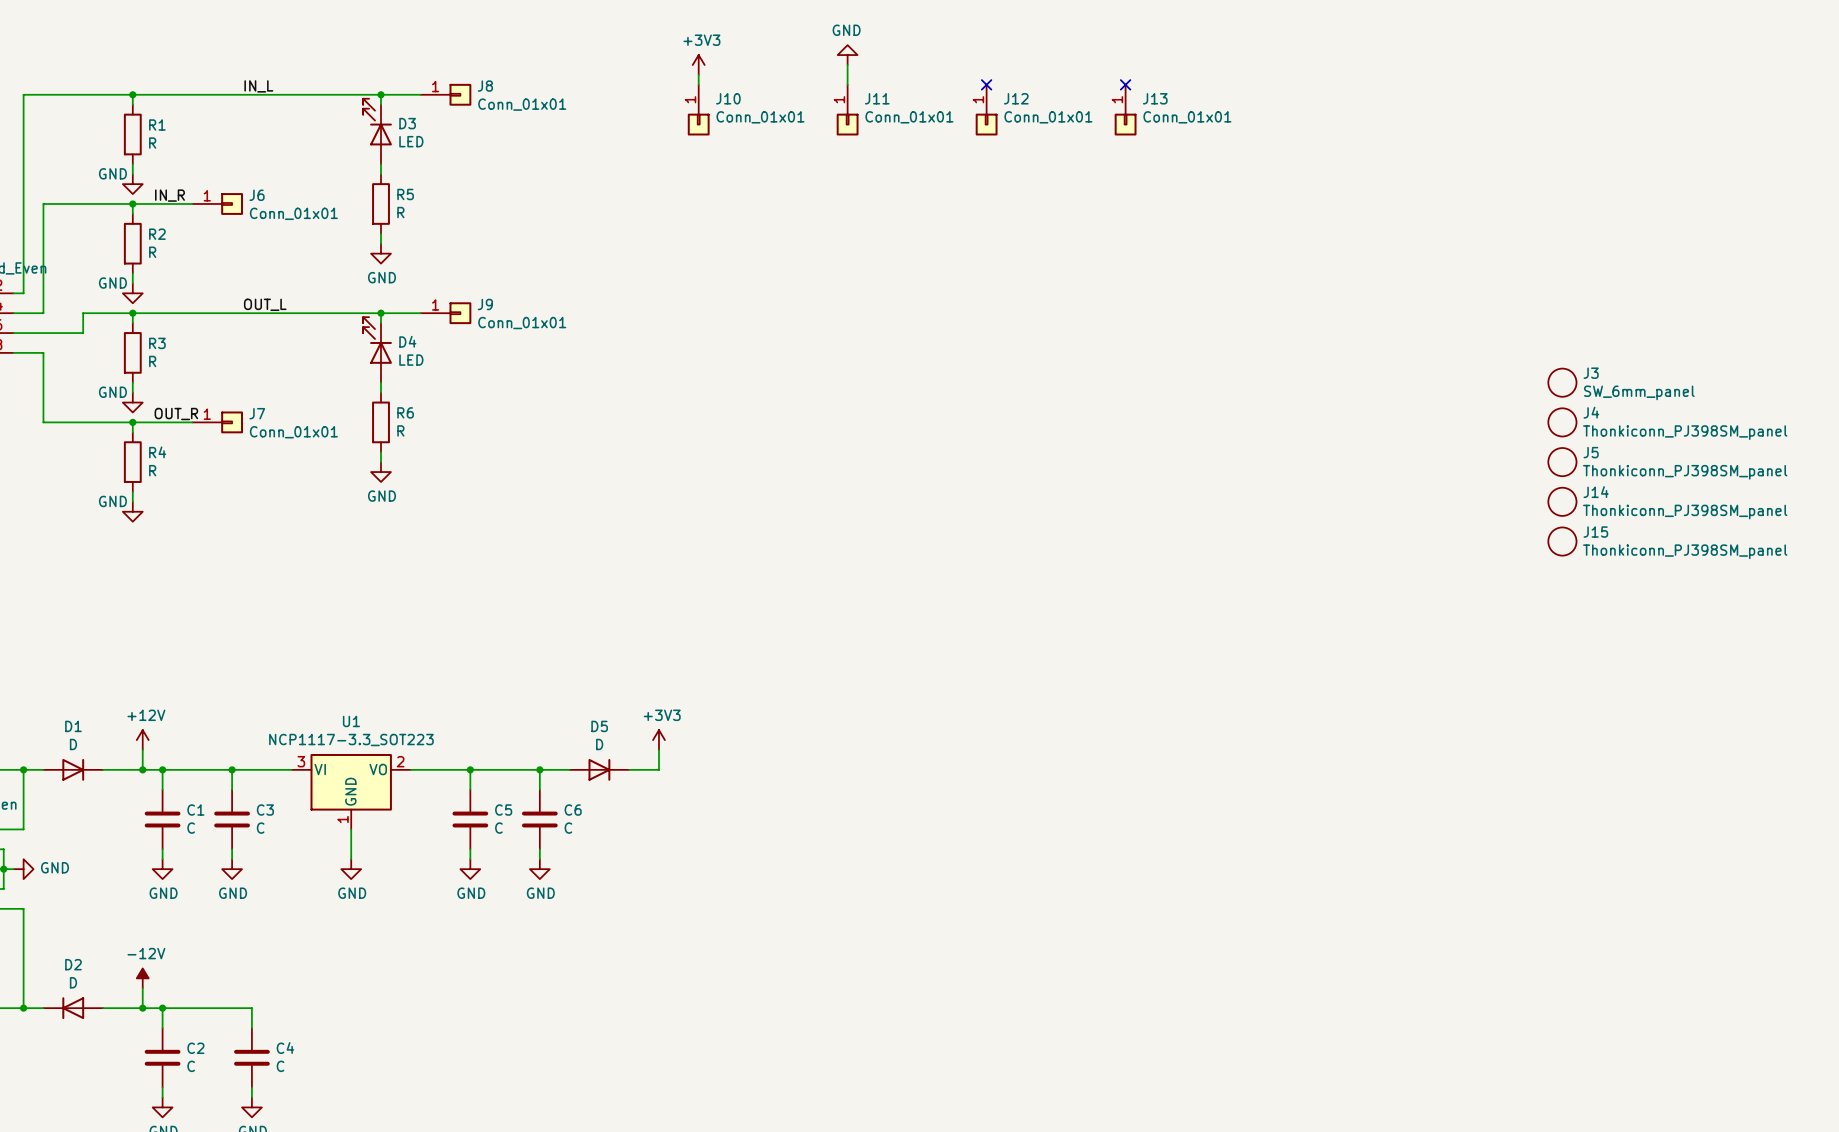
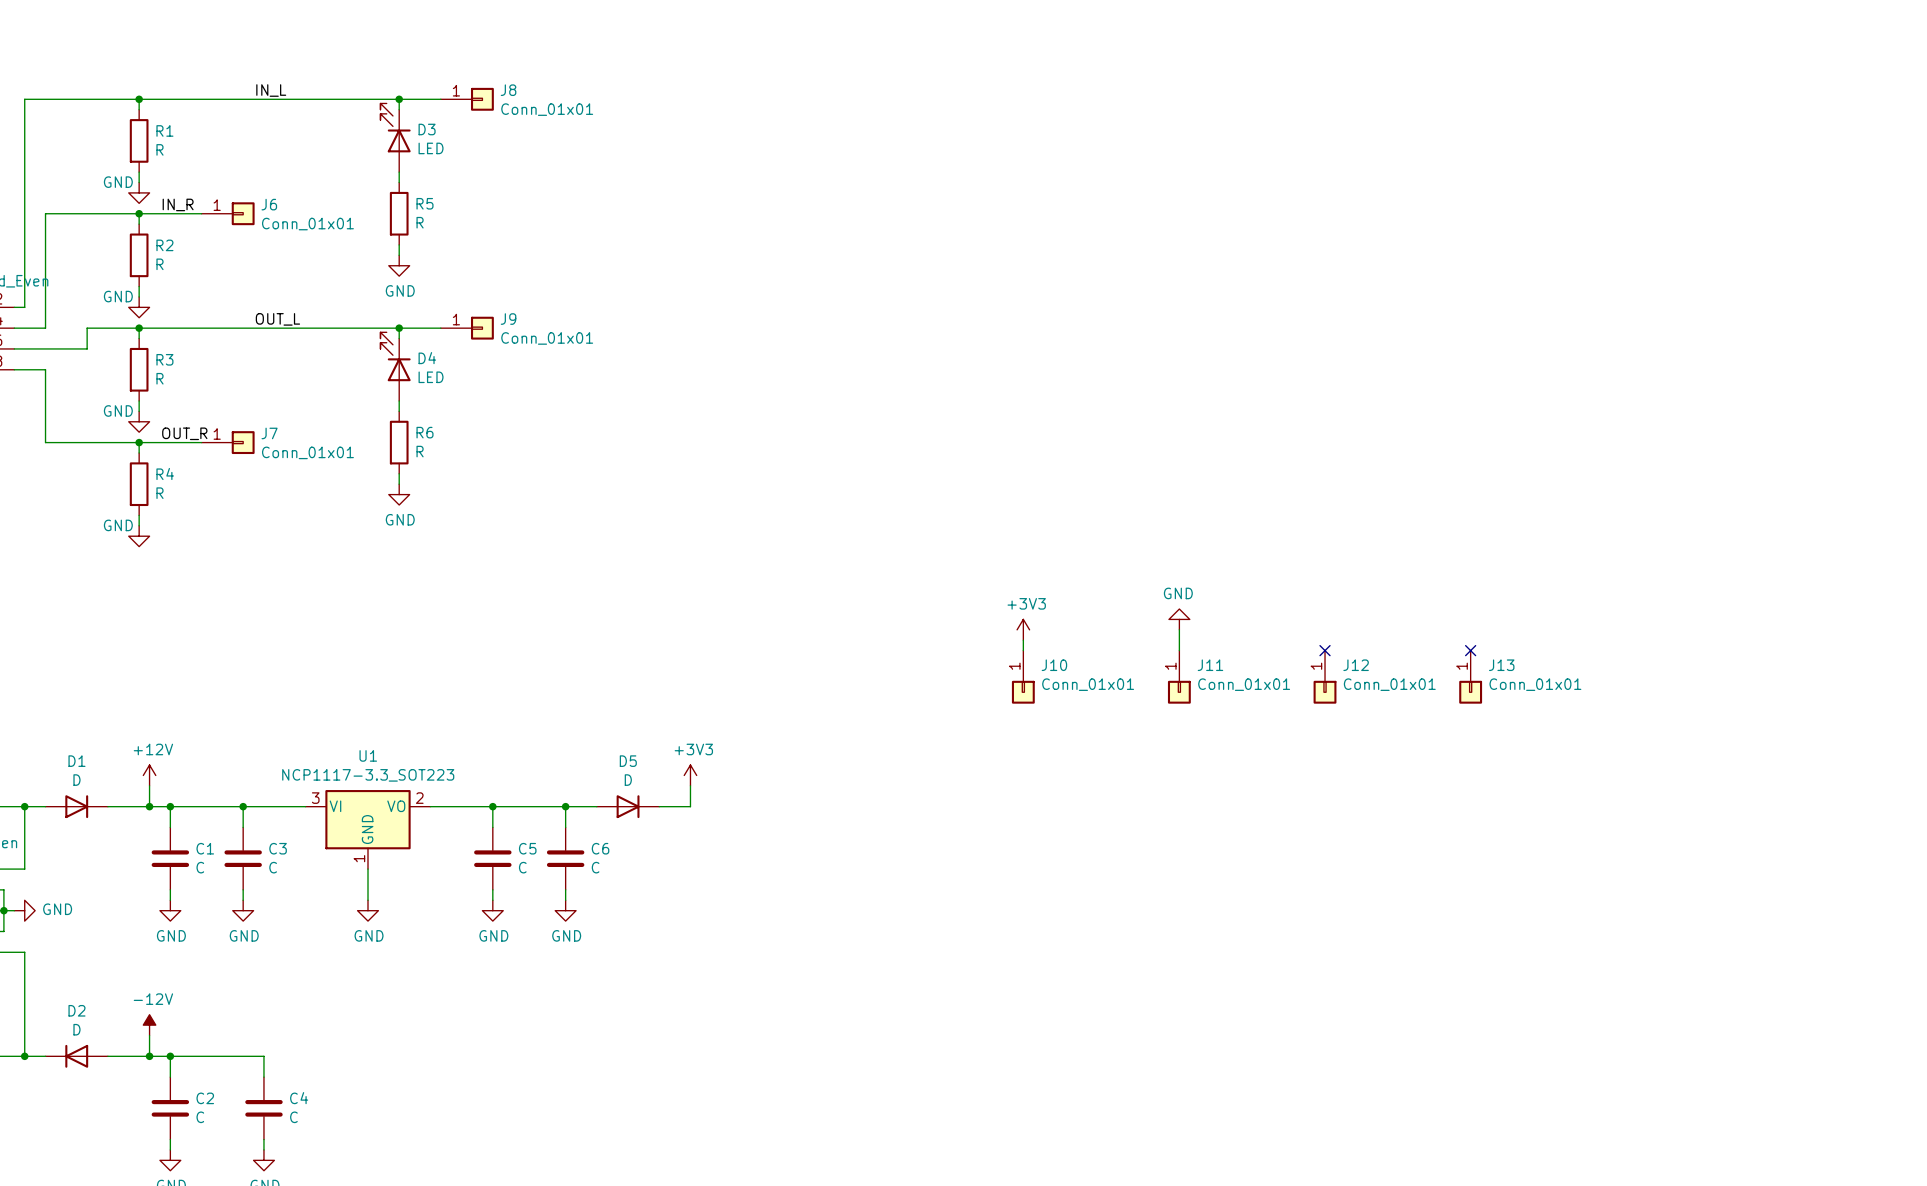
power symbol: GND (847, 55) -> none
power symbol: +3V3 (698, 64) -> none
wire: (847, 64) (847, 84) -> none
wire: (698, 74) (698, 84) -> none
no-connect mark: (986, 84) -> none
no-connect mark: (1125, 84) -> none
J10 position: (698, 110) -> (1023, 677)
J11 position: (847, 110) -> (1179, 677)
J12 position: (986, 110) -> (1325, 677)
J13 position: (1125, 110) -> (1470, 677)
J3: SW_6mm_panel (1562, 382) -> none
J4: Thonkiconn_PJ398SM_panel (1562, 422) -> none
J5: Thonkiconn_PJ398SM_panel (1562, 462) -> none
J14: Thonkiconn_PJ398SM_panel (1562, 501) -> none
J15: Thonkiconn_PJ398SM_panel (1562, 541) -> none
power symbol: none -> GND (1179, 619)
power symbol: none -> +3V3 (1023, 629)
wire: none -> (1179, 629) (1179, 650)
wire: none -> (1023, 640) (1023, 650)
no-connect mark: none -> (1325, 650)
no-connect mark: none -> (1470, 650)

